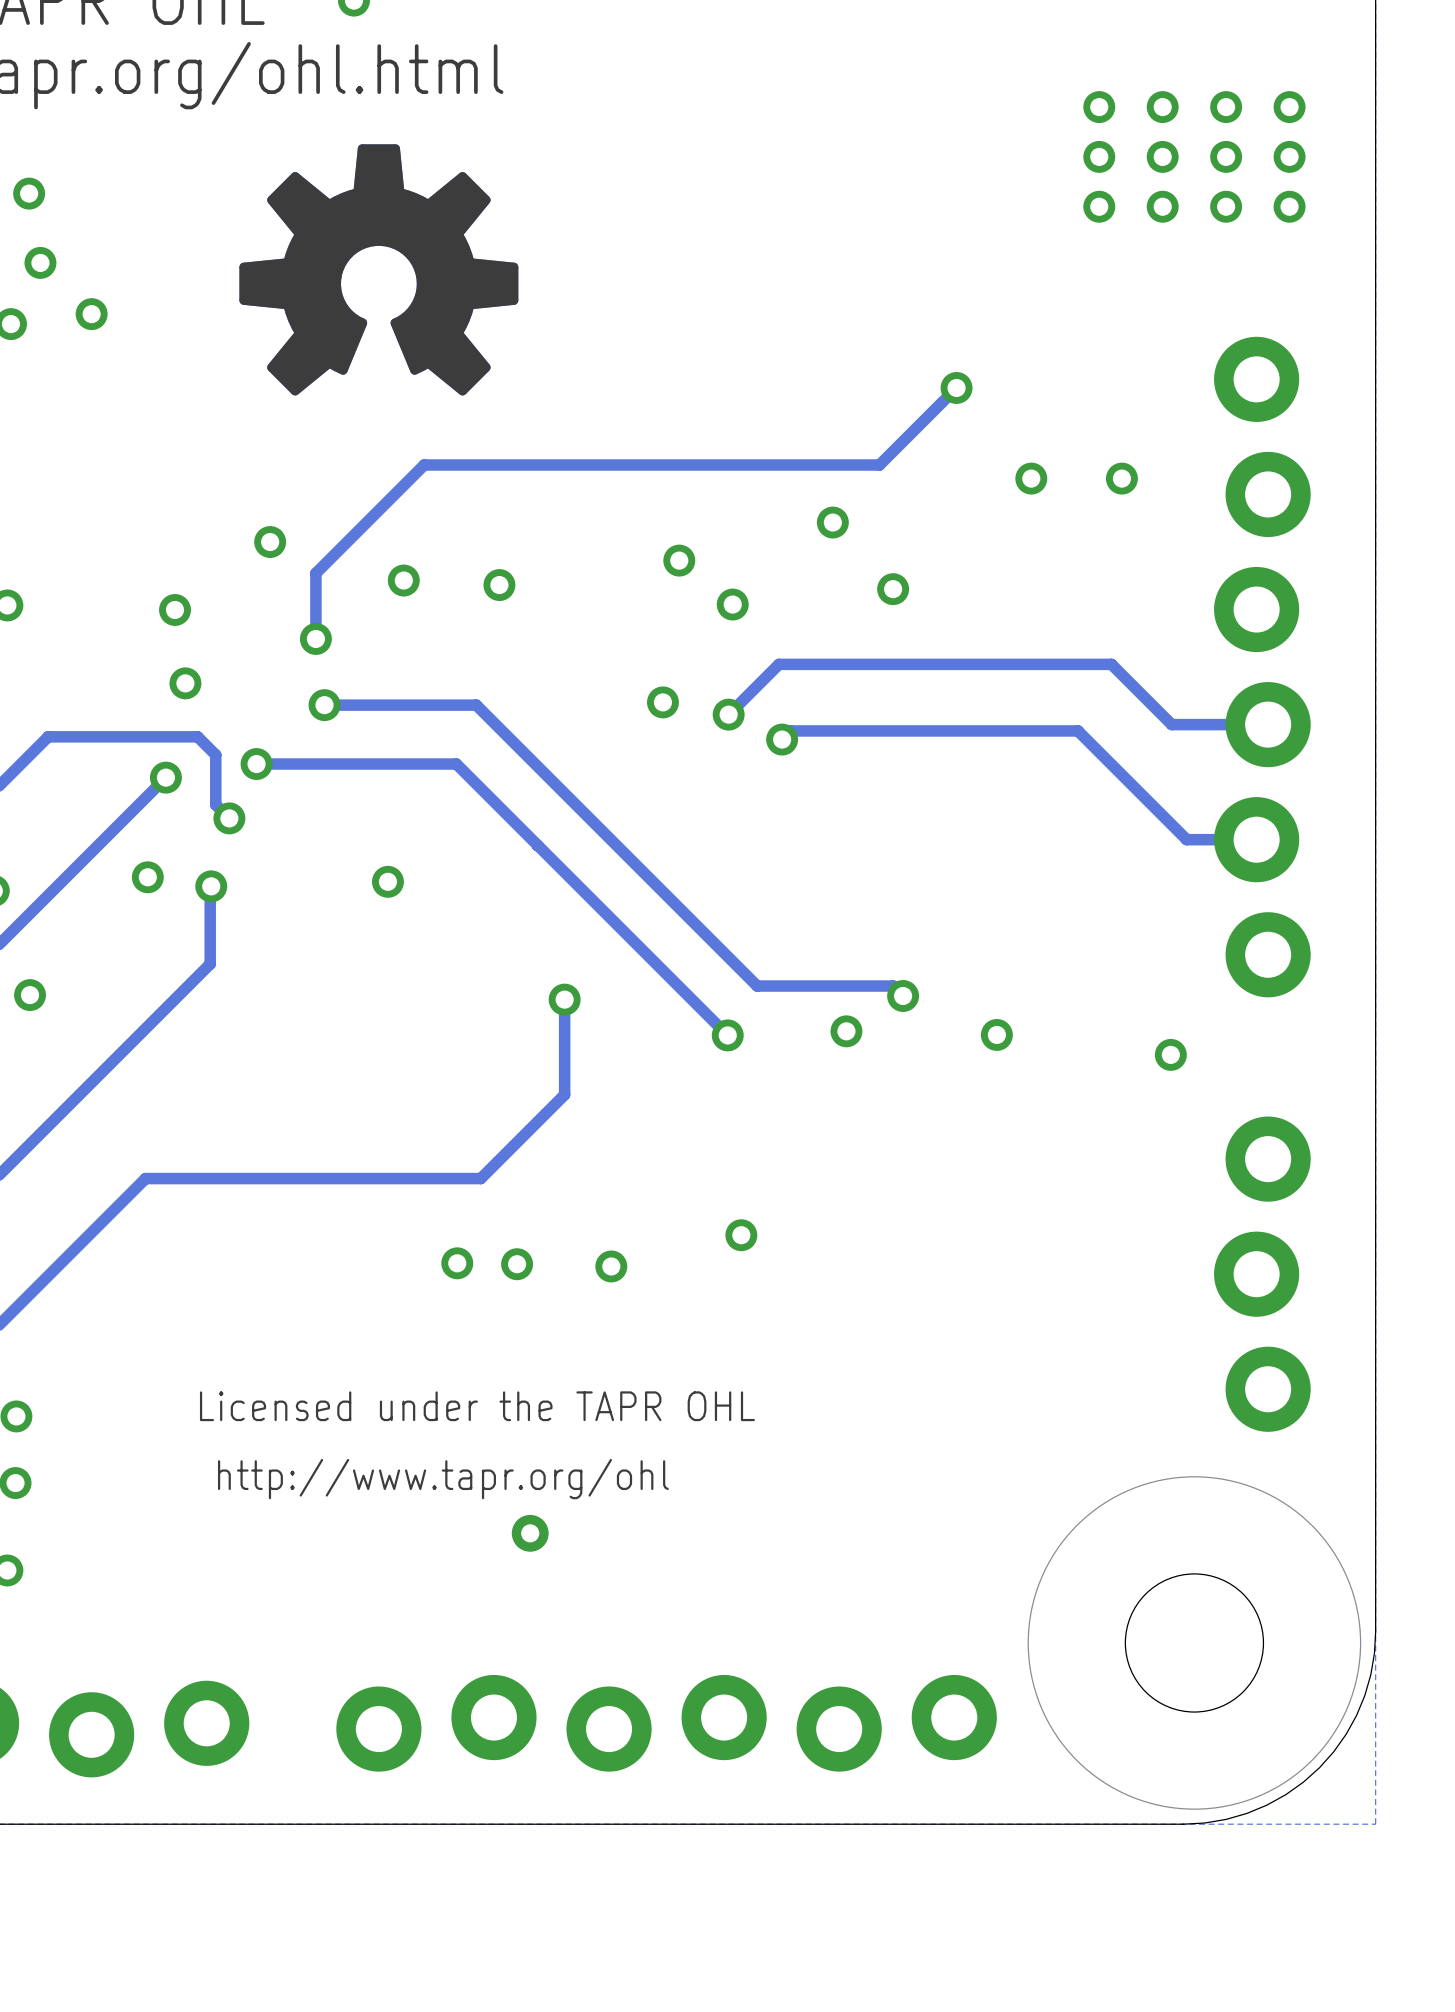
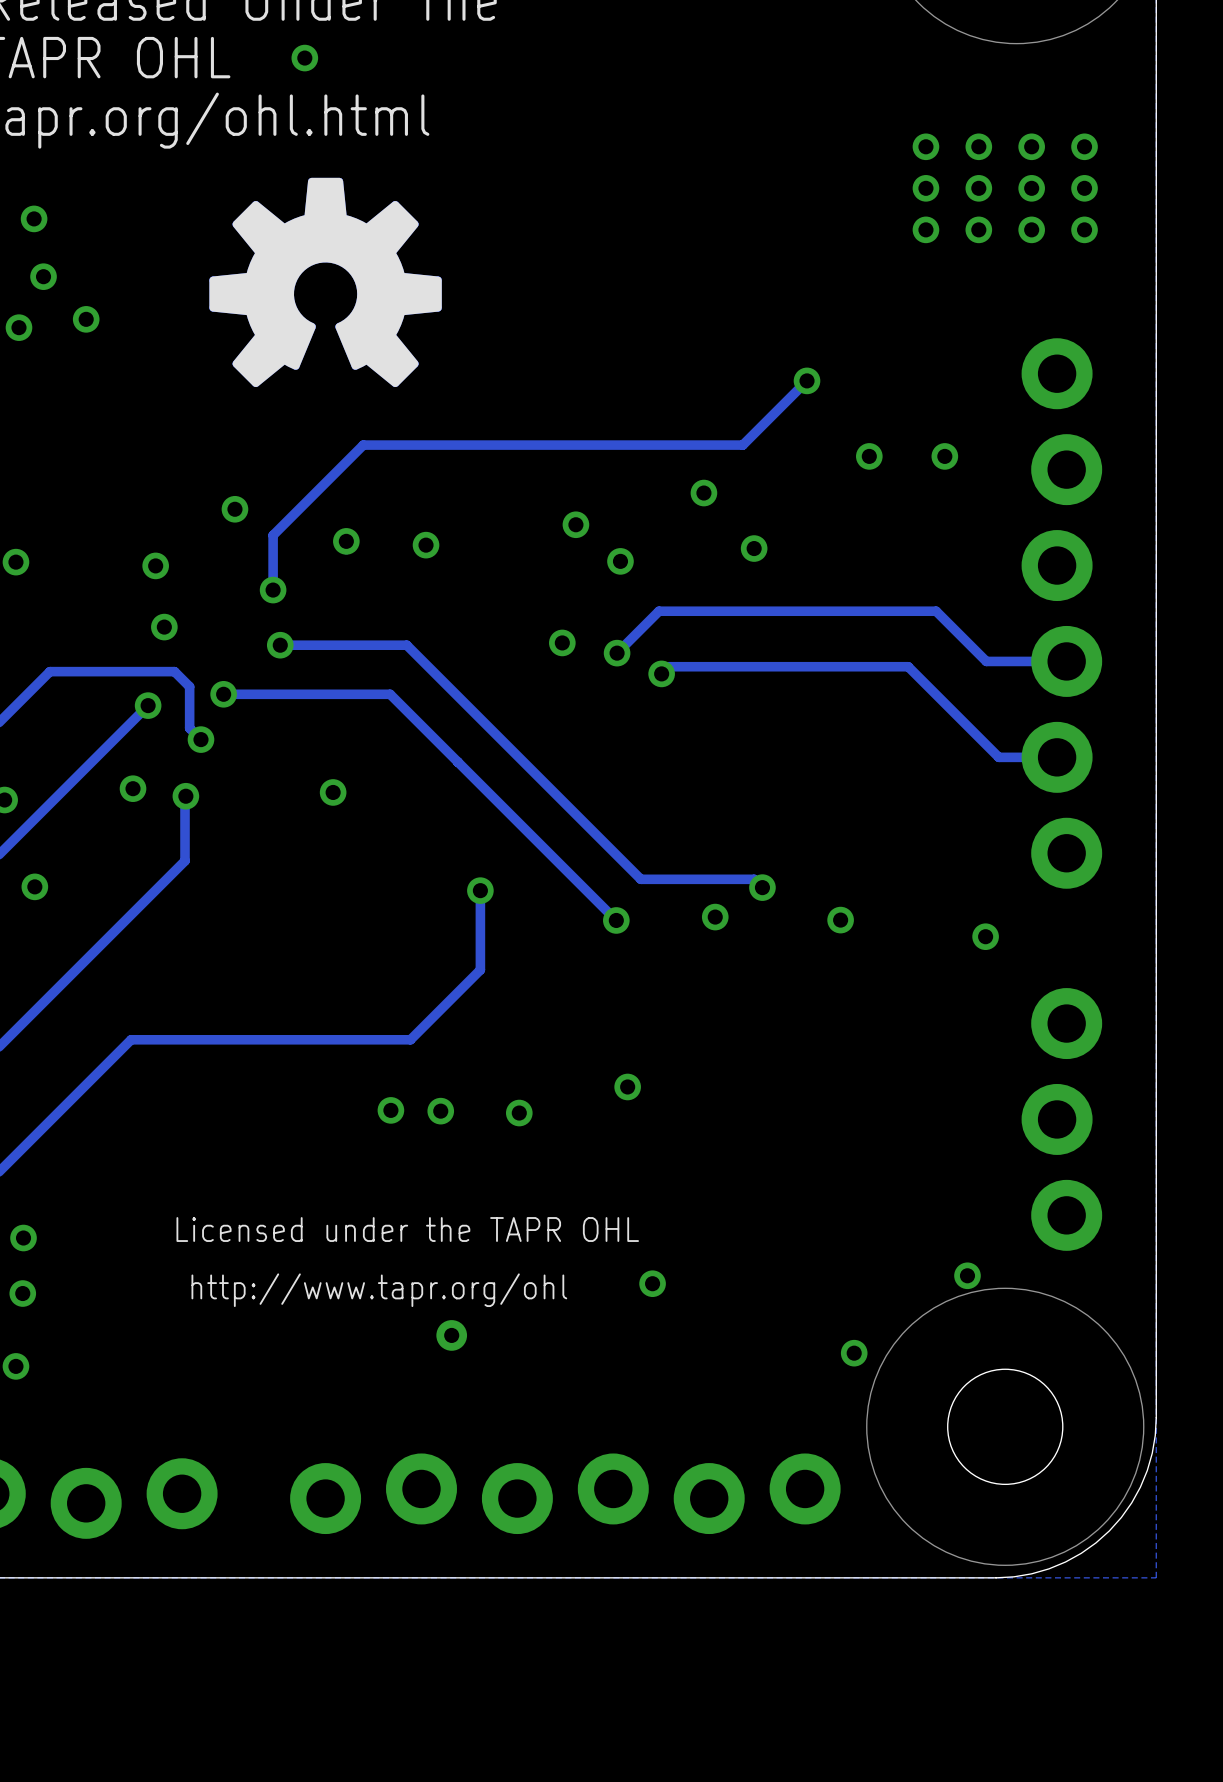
via: none -> (967, 1275)
via: none -> (652, 1283)
via: none -> (854, 1353)

